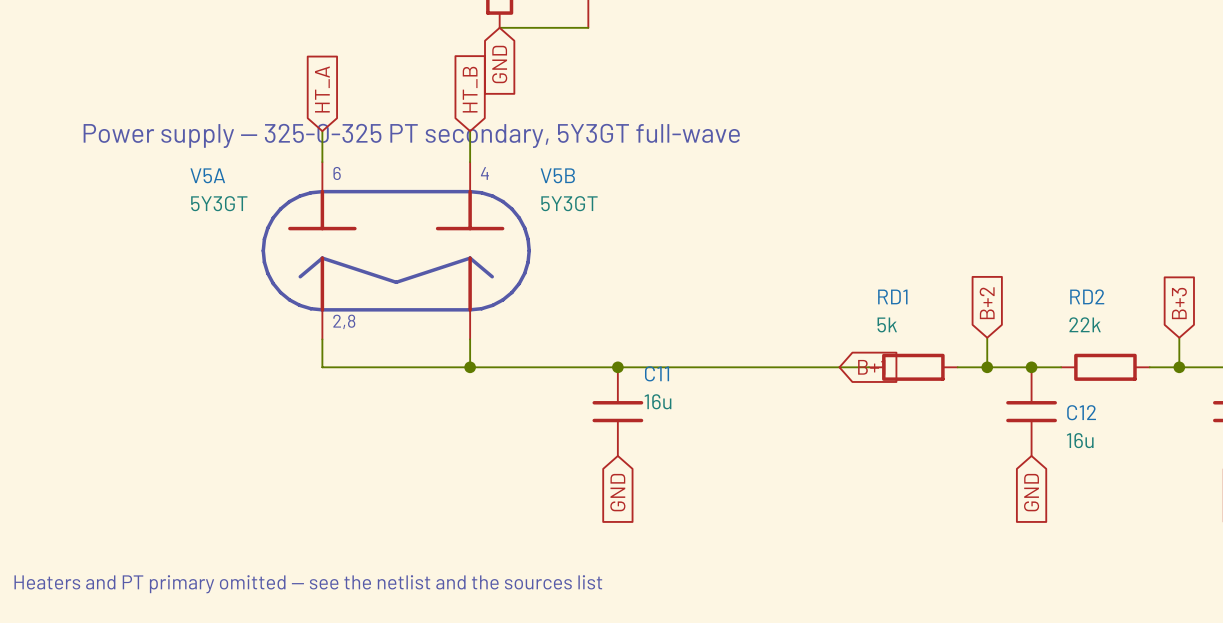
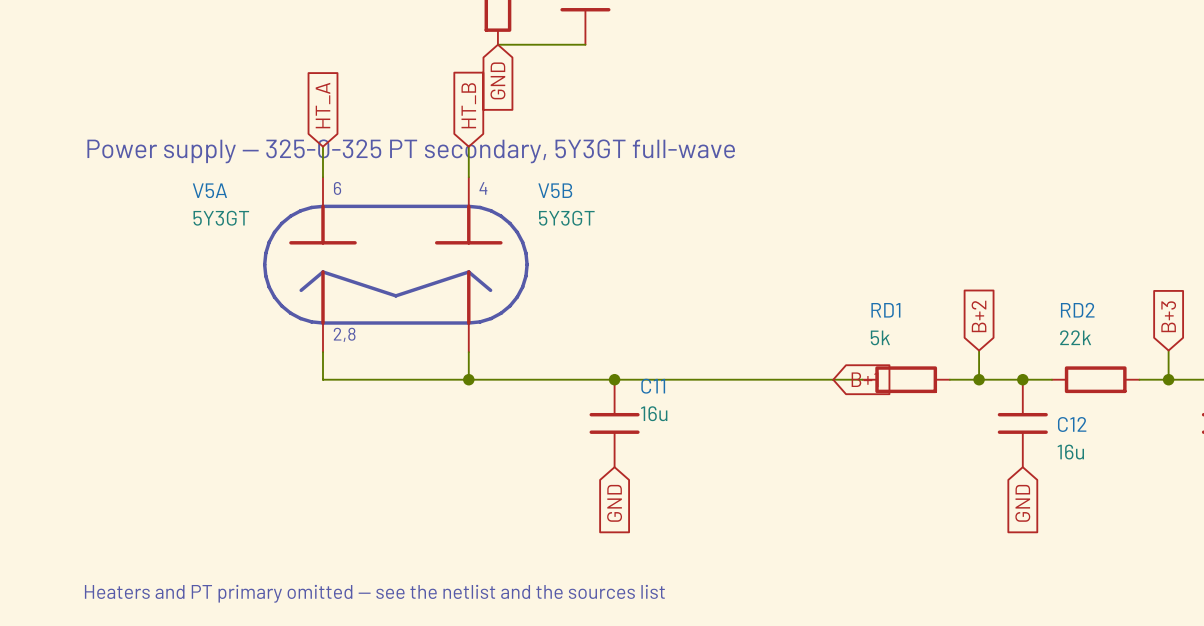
text position: Heaters and PT primary omitted — see the netlist and the sources list (308, 584) -> Heaters and PT primary omitted — see the netlist and the sources list (374, 593)

